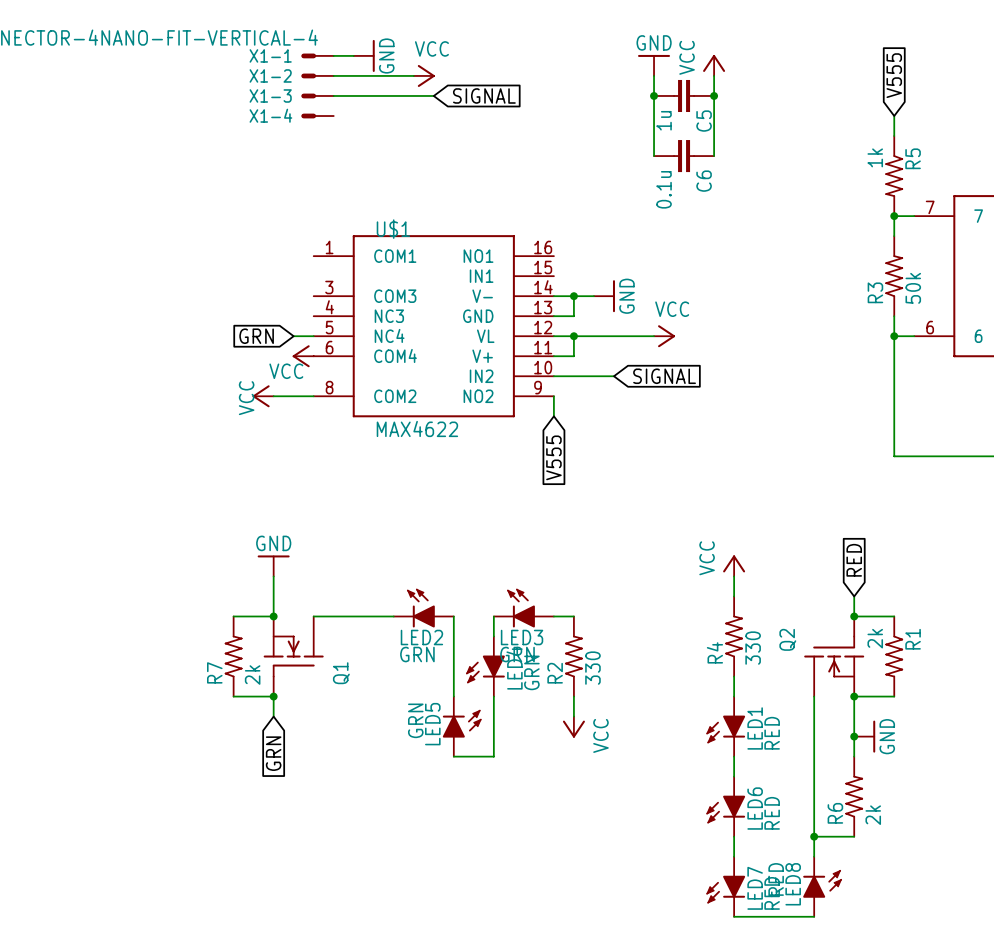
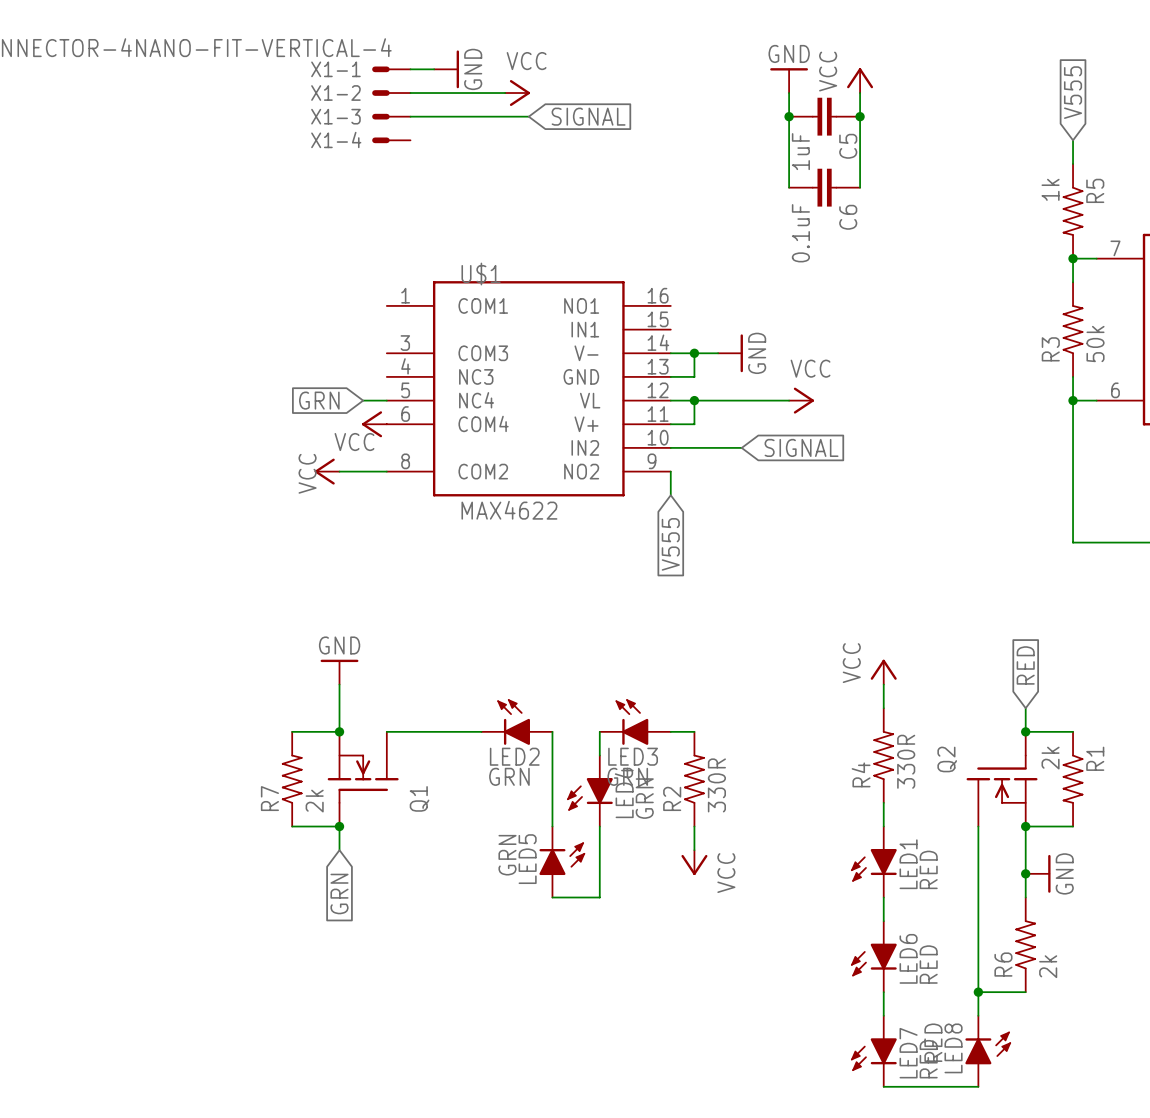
C5 value: 1u (664, 120) -> 1uF (800, 151)
C6 value: 0.1u (664, 189) -> 0.1uF (800, 233)
R4 value: 330 (753, 648) -> 330R (906, 761)
R2 value: 330 (592, 668) -> 330R (716, 785)

